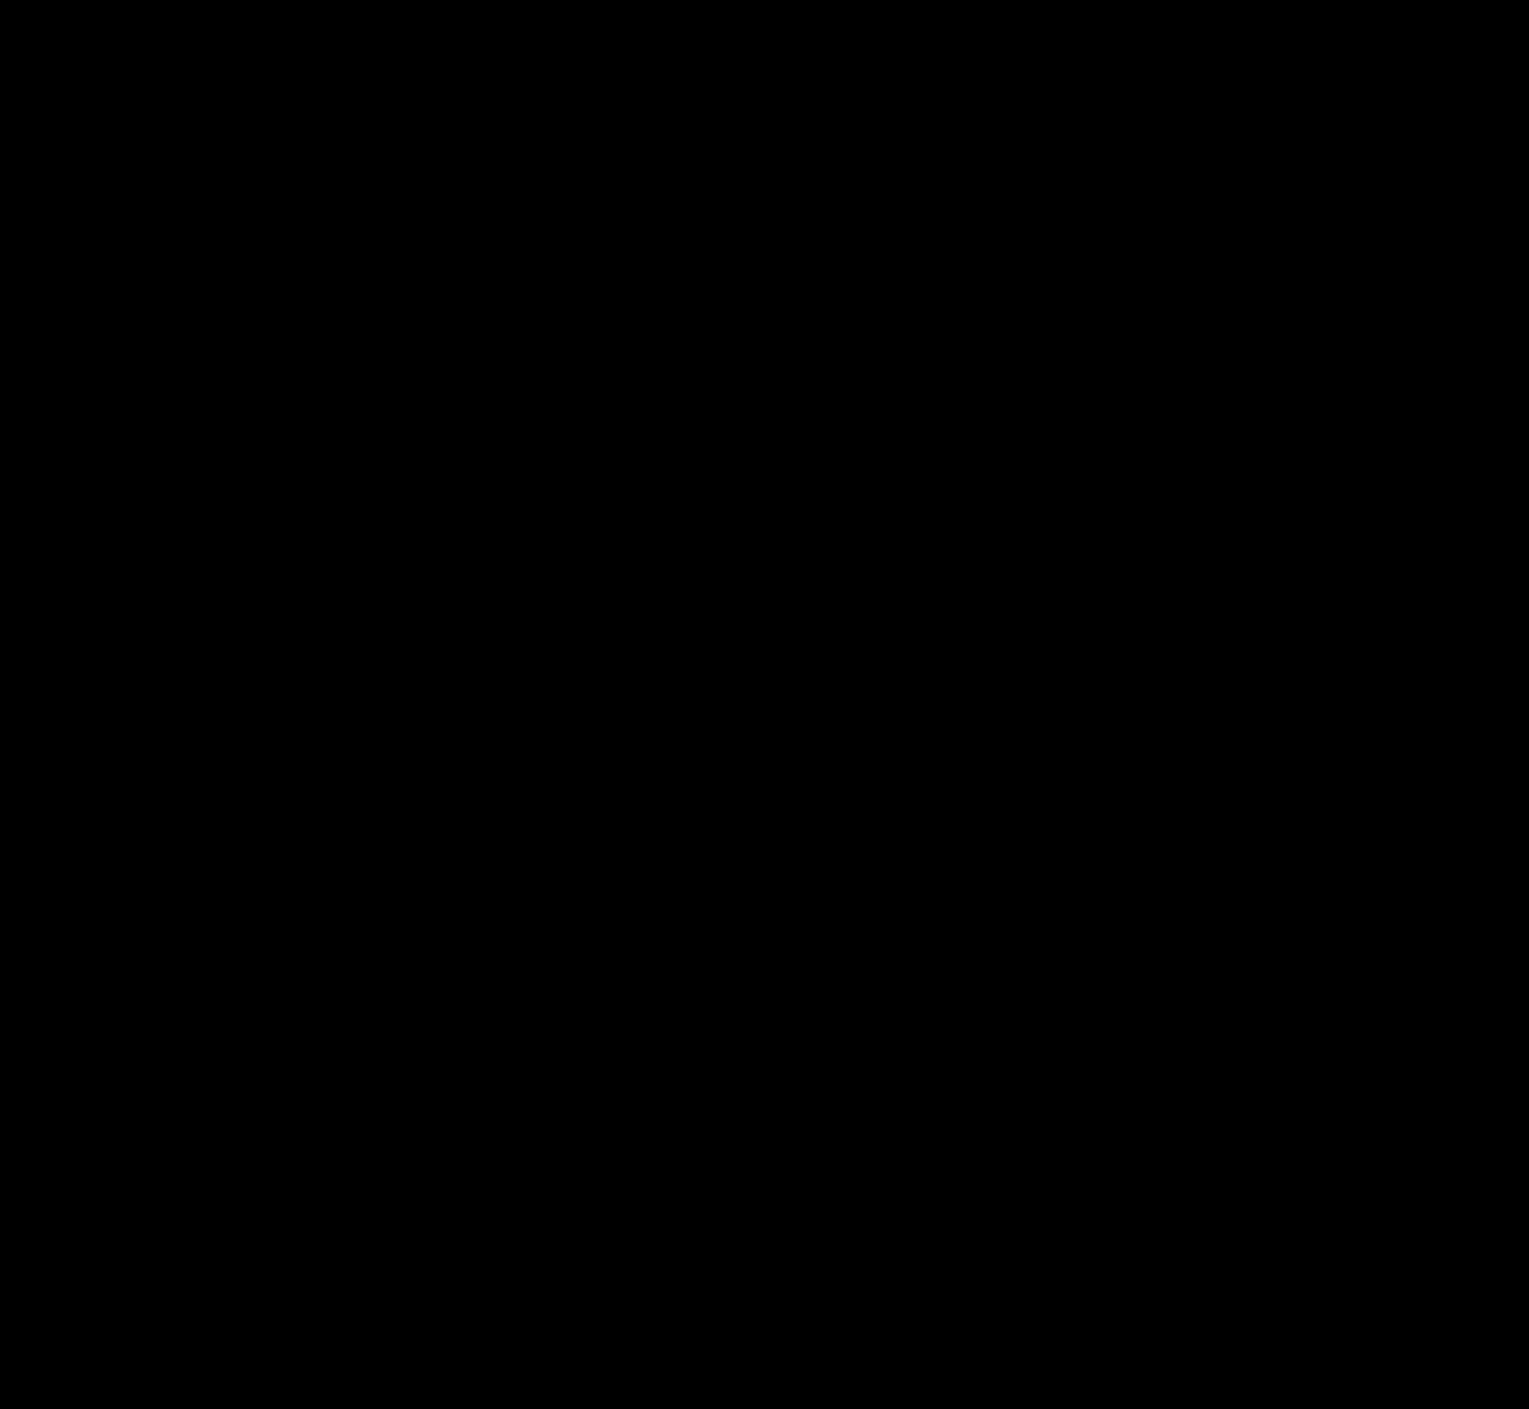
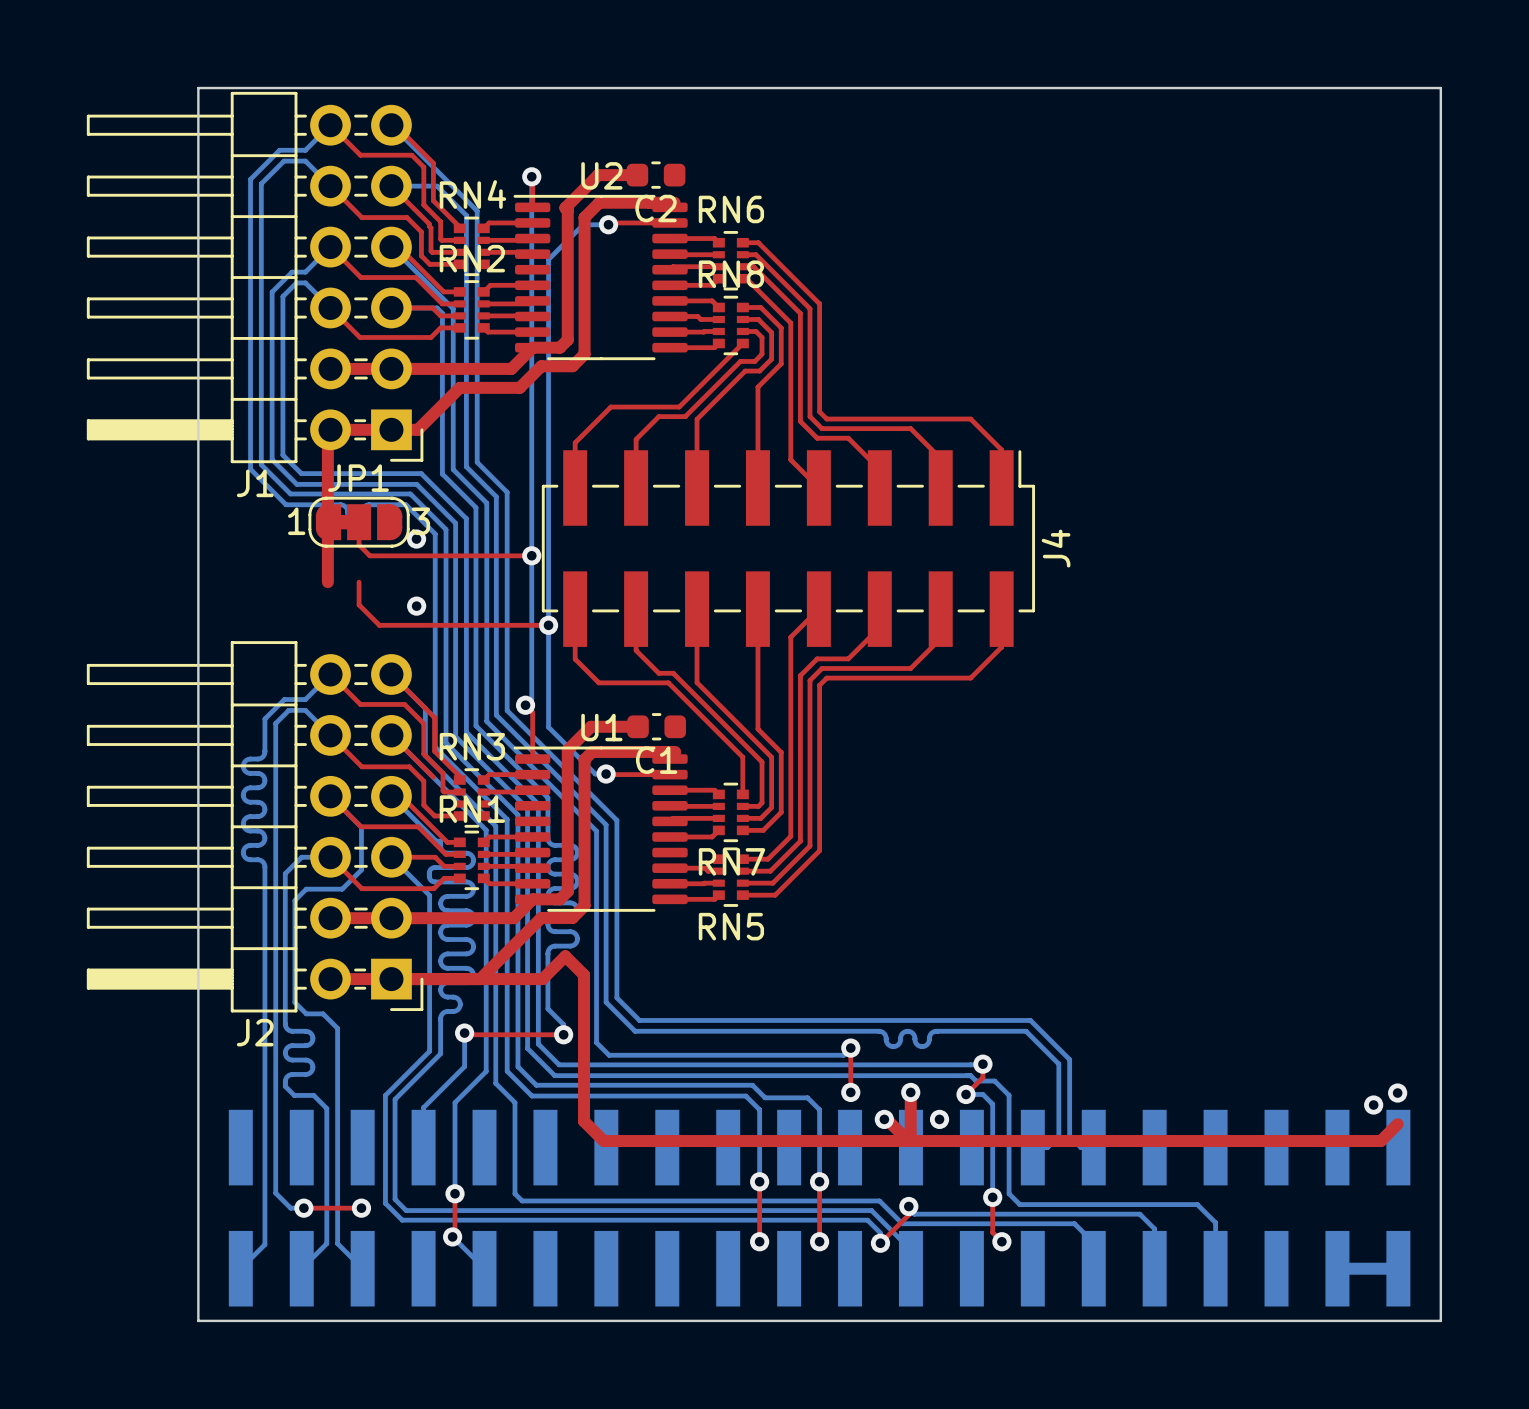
board edge: none -> (198, 88) (198, 1320) (1440, 1320) (1440, 88) (198, 88)
top track: none -> (330, 125) (360, 155) (411, 155) (423, 167) (423, 204) (440, 221) (440, 239) (459, 240)
bottom track: none -> (330, 125) (305, 150) (279, 150) (250, 179) (250, 469) (286, 504) (342, 505) (347, 509) (348, 521) (354, 524) (361, 521) (362, 509) (366, 505) (405, 504) (435, 534) (435, 747) (507, 819) (507, 1071) (531, 1096) (745, 1096) (759, 1109) (759, 1181)
top track: none -> (391, 125) (395, 125) (433, 163) (433, 200) (459, 228)
bottom track: none -> (391, 125) (477, 210) (477, 462) (507, 492) (507, 710) (616, 820) (616, 997) (639, 1020) (1030, 1020) (1069, 1059) (1069, 1136) (1081, 1147) (1093, 1147)
top track: none -> (637, 175) (598, 175) (565, 207) (567, 210) (567, 339) (559, 347) (532, 347) (511, 368) (330, 368)
C2: none -> (656, 175)
top track: none -> (531, 176) (532, 207)
bottom track: none -> (531, 176) (531, 699) (525, 705)
via: none -> (531, 176)
top track: none -> (330, 186) (361, 217) (407, 217) (421, 231) (421, 255) (429, 264) (459, 264)
bottom track: none -> (330, 186) (305, 161) (284, 161) (261, 183) (261, 464) (290, 493) (410, 493) (446, 529) (446, 743) (517, 814) (517, 1066) (536, 1085) (752, 1085) (765, 1097) (807, 1097) (819, 1109) (819, 1181)
top track: none -> (391, 186) (429, 223) (432, 252) (459, 252)
bottom track: none -> (391, 186) (437, 186) (466, 215) (466, 466) (496, 496) (496, 715) (606, 824) (606, 1002) (635, 1031) (878, 1031) (884, 1033) (887, 1043) (893, 1046) (898, 1044) (901, 1034) (906, 1031) (912, 1033) (916, 1043) (922, 1046) (927, 1044) (930, 1034) (935, 1031) (1026, 1031) (1058, 1064) (1058, 1136) (1047, 1147) (1032, 1147)
top track: none -> (669, 207) (674, 202) (599, 202) (584, 217) (584, 354) (572, 366) (541, 366) (519, 387) (459, 387) (417, 429) (330, 429) (327, 432) (327, 582)
top track: none -> (532, 222) (489, 222) (483, 228)
top track: none -> (669, 222) (610, 222) (608, 224)
bottom track: none -> (608, 224) (583, 224) (548, 259) (548, 727) (595, 774) (606, 774)
via: none -> (608, 224)
top track: none -> (532, 238) (530, 240) (483, 240)
top track: none -> (669, 238) (714, 238) (718, 242)
top track: none -> (742, 242) (758, 242) (819, 303) (819, 411) (826, 419) (970, 419) (1001, 449) (1001, 487)
RN4: none -> (471, 246)
top track: none -> (330, 247) (360, 277) (415, 277) (442, 303) (459, 303)
bottom track: none -> (330, 247) (305, 272) (292, 272) (272, 292) (272, 459) (296, 484) (416, 484) (455, 523) (455, 736) (527, 808) (527, 1048) (554, 1075) (970, 1075) (976, 1081) (994, 1081) (1009, 1095) (1009, 1193) (1019, 1204) (1197, 1204) (1215, 1222) (1215, 1268)
top track: none -> (391, 247) (398, 247) (443, 291) (459, 291)
bottom track: none -> (391, 247) (453, 308) (453, 469) (486, 503) (486, 721) (596, 831) (596, 1042) (609, 1055) (843, 1055) (850, 1048)
top track: none -> (483, 252) (530, 252) (532, 254)
top track: none -> (669, 254) (718, 254)
top track: none -> (742, 254) (756, 254) (810, 308) (810, 416) (821, 428) (910, 428) (940, 458) (940, 487)
RN6: none -> (730, 260)
top track: none -> (718, 266) (672, 266) (669, 269)
top track: none -> (742, 266) (753, 266) (800, 313) (800, 421) (817, 438) (848, 438) (879, 469) (879, 487)
J1: none -> (255, 277)
U2: none -> (600, 277)
top track: none -> (718, 278) (712, 285) (669, 285)
top track: none -> (742, 278) (746, 278) (790, 323) (790, 459) (818, 487)
top track: none -> (532, 285) (490, 285) (483, 291)
top track: none -> (532, 300) (529, 303) (483, 303)
top track: none -> (669, 300) (712, 300) (718, 307)
top track: none -> (330, 307) (360, 337) (431, 337) (440, 327) (459, 327)
bottom track: none -> (330, 307) (305, 282) (296, 282) (282, 296) (282, 455) (301, 473) (421, 473) (466, 518) (466, 732) (538, 804) (538, 1044) (559, 1064) (982, 1064)
top track: none -> (391, 307) (432, 307) (440, 315) (459, 315)
bottom track: none -> (391, 307) (437, 307) (442, 313) (442, 474) (475, 507) (475, 725) (547, 797) (549, 842) (554, 845) (572, 845) (577, 850) (573, 858) (553, 859) (548, 866) (552, 873) (572, 874) (577, 880) (573, 887) (553, 888) (548, 894) (552, 902) (572, 903) (577, 909) (573, 916) (553, 917) (548, 923) (552, 931) (572, 931) (577, 937) (573, 945) (553, 946) (548, 952) (547, 1008) (563, 1024) (563, 1034)
top track: none -> (742, 307) (760, 307) (781, 327) (781, 363) (757, 387) (757, 487)
RN2: none -> (471, 309)
top track: none -> (483, 315) (532, 316)
top track: none -> (669, 316) (697, 316) (700, 319) (718, 319)
top track: none -> (742, 319) (758, 319) (771, 332) (771, 359) (759, 371) (745, 371) (697, 419) (697, 487)
RN8: none -> (730, 325)
top track: none -> (483, 327) (487, 332) (532, 332)
top track: none -> (718, 331) (669, 332)
top track: none -> (742, 331) (756, 331) (762, 337) (762, 354) (754, 361) (740, 361) (685, 416) (658, 416) (636, 439) (636, 487)
top track: none -> (718, 343) (714, 347) (669, 347)
top track: none -> (742, 343) (679, 407) (610, 407) (575, 442) (575, 487)
top track: none -> (359, 522) (359, 544) (369, 555) (531, 555)
JP1: none -> (359, 522)
via: none -> (416, 539)
J4: none -> (788, 548)
via: none -> (531, 555)
top track: none -> (359, 582) (359, 604) (379, 625) (548, 625)
via: none -> (416, 606)
top track: none -> (575, 609) (575, 659) (598, 682) (668, 682) (742, 757) (742, 794)
top track: none -> (636, 609) (636, 650) (658, 673) (673, 673) (762, 762) (762, 802) (758, 806) (742, 806)
top track: none -> (697, 609) (697, 682) (771, 757) (771, 807) (760, 818) (742, 818)
top track: none -> (757, 609) (757, 729) (781, 752) (781, 812) (763, 830) (742, 830)
top track: none -> (818, 609) (790, 637) (790, 836) (768, 859) (742, 859)
top track: none -> (879, 609) (879, 627) (848, 658) (817, 658) (800, 675) (800, 841) (770, 871) (742, 871)
top track: none -> (940, 609) (940, 638) (910, 668) (821, 668) (810, 680) (810, 845) (772, 883) (742, 883)
top track: none -> (1001, 609) (1001, 647) (970, 678) (826, 678) (819, 685) (819, 850) (775, 895) (742, 895)
via: none -> (548, 625)
top track: none -> (330, 674) (360, 704) (404, 704) (423, 723) (423, 754) (443, 773) (443, 790) (459, 792)
bottom track: none -> (330, 674) (305, 699) (284, 699) (264, 719) (264, 754) (259, 758) (246, 759) (243, 765) (246, 771) (260, 773) (264, 780) (261, 786) (247, 788) (243, 795) (246, 801) (260, 802) (264, 809) (260, 816) (246, 817) (243, 823) (246, 830) (260, 831) (264, 838) (261, 844) (247, 845) (243, 852) (246, 858) (260, 860) (264, 866) (264, 1244) (240, 1268)
top track: none -> (391, 674) (434, 717) (434, 751) (459, 776) (459, 780)
bottom track: none -> (391, 674) (425, 708) (425, 755) (495, 826) (495, 1083) (514, 1102) (514, 1193) (522, 1200) (879, 1200) (902, 1223) (1074, 1223) (1093, 1242) (1093, 1268)
top track: none -> (525, 705) (532, 712) (532, 759)
via: none -> (525, 705)
top track: none -> (638, 726) (591, 726) (567, 750) (567, 891) (559, 899) (532, 899) (513, 918) (330, 918) (391, 918)
C1: none -> (656, 726)
top track: none -> (330, 735) (361, 766) (409, 766) (423, 781) (423, 805) (434, 816) (459, 816)
bottom track: none -> (330, 735) (305, 710) (288, 710) (275, 723) (275, 1193) (290, 1208) (303, 1208)
top track: none -> (391, 735) (433, 777)
bottom track: none -> (391, 735) (486, 830) (486, 1071) (455, 1102) (455, 1193)
top track: none -> (669, 759) (675, 751) (592, 751) (584, 759) (584, 905) (572, 917) (541, 917) (480, 979)
top track: none -> (532, 774) (489, 774) (483, 780)
top track: none -> (606, 774) (669, 774)
via: none -> (606, 774)
top track: none -> (532, 790) (530, 792) (483, 792)
top track: none -> (669, 790) (714, 790) (718, 794)
top track: none -> (330, 796) (360, 826) (418, 826) (445, 854) (459, 854)
bottom track: none -> (330, 796) (361, 827) (361, 869) (342, 889) (306, 889) (294, 900) (294, 1002) (306, 1013) (323, 1013) (337, 1028) (337, 1243) (362, 1268)
top track: none -> (391, 796) (401, 796) (447, 842) (459, 842)
bottom track: none -> (391, 796) (436, 841) (440, 841) (443, 851) (468, 853) (473, 860) (468, 867) (434, 867) (429, 872) (429, 878) (433, 881) (467, 882) (473, 886) (473, 891) (469, 895) (445, 896) (440, 903) (445, 910) (467, 910) (472, 913) (473, 918) (469, 924) (445, 925) (440, 932) (445, 939) (469, 940) (473, 944) (473, 949) (467, 953) (445, 954) (440, 961) (445, 968) (469, 968) (473, 976) (468, 982) (446, 982) (441, 986) (442, 994) (456, 998) (460, 1004) (456, 1010) (445, 1012) (441, 1015) (440, 1053) (395, 1099) (395, 1199) (406, 1210) (871, 1210) (910, 1250) (910, 1268)
RN3: none -> (471, 798)
top track: none -> (669, 805) (718, 806)
RN7: none -> (730, 812)
top track: none -> (718, 818) (672, 818) (669, 821)
J2: none -> (255, 826)
U1: none -> (600, 829)
top track: none -> (718, 830) (712, 836) (669, 836)
top track: none -> (532, 836) (489, 836) (483, 842)
top track: none -> (532, 852) (530, 854) (483, 854)
top track: none -> (330, 857) (361, 888) (433, 888) (444, 878) (459, 878)
bottom track: none -> (330, 857) (301, 857) (285, 873) (285, 1025) (290, 1031) (308, 1031) (312, 1038) (308, 1045) (291, 1045) (286, 1049) (285, 1053) (288, 1058) (308, 1060) (312, 1067) (308, 1073) (288, 1075) (285, 1086) (294, 1095) (313, 1095) (326, 1108) (326, 1243) (301, 1268)
top track: none -> (391, 857) (435, 857) (444, 866) (459, 866)
bottom track: none -> (391, 857) (429, 895) (429, 1051) (385, 1095) (385, 1203) (402, 1220) (867, 1220) (880, 1233) (880, 1243)
RN1: none -> (471, 860)
top track: none -> (483, 866) (530, 866) (532, 868)
top track: none -> (669, 868) (705, 868) (708, 871) (718, 871)
RN5: none -> (730, 877)
top track: none -> (483, 878) (489, 883) (532, 883)
top track: none -> (718, 883) (669, 883)
top track: none -> (718, 895) (714, 899) (669, 899)
top track: none -> (330, 979) (542, 979) (565, 956) (584, 974) (584, 1121) (603, 1141) (1380, 1141) (1397, 1124)
top track: none -> (464, 1033) (466, 1034) (563, 1034)
bottom track: none -> (464, 1033) (464, 1066) (423, 1107) (423, 1147)
via: none -> (464, 1033)
via: none -> (563, 1034)
top track: none -> (850, 1048) (850, 1092)
via: none -> (850, 1048)
top track: none -> (982, 1064) (982, 1077) (966, 1094)
via: none -> (982, 1064)
via: none -> (850, 1092)
top track: none -> (910, 1092) (910, 1138) (908, 1141) (886, 1119) (884, 1119)
via: none -> (910, 1092)
via: none -> (1397, 1093)
bottom track: none -> (966, 1094) (982, 1094) (992, 1104) (992, 1197)
via: none -> (966, 1094)
via: none -> (1373, 1105)
via: none -> (884, 1119)
via: none -> (939, 1119)
top track: none -> (759, 1181) (759, 1241)
via: none -> (759, 1181)
top track: none -> (819, 1181) (819, 1241)
via: none -> (819, 1181)
top track: none -> (455, 1193) (455, 1234) (452, 1236)
via: none -> (455, 1193)
top track: none -> (992, 1197) (992, 1232) (1001, 1241)
via: none -> (992, 1197)
top track: none -> (908, 1206) (908, 1214) (880, 1243)
bottom track: none -> (908, 1206) (914, 1214) (1139, 1214) (1154, 1229) (1154, 1268)
via: none -> (908, 1206)
top track: none -> (303, 1208) (361, 1208)
via: none -> (303, 1208)
via: none -> (361, 1208)
part: none -> (819, 1208)
bottom track: none -> (452, 1236) (484, 1268)
via: none -> (452, 1236)
via: none -> (759, 1241)
via: none -> (819, 1241)
via: none -> (1001, 1241)
via: none -> (880, 1243)
bottom track: none -> (1337, 1268) (1398, 1268)

